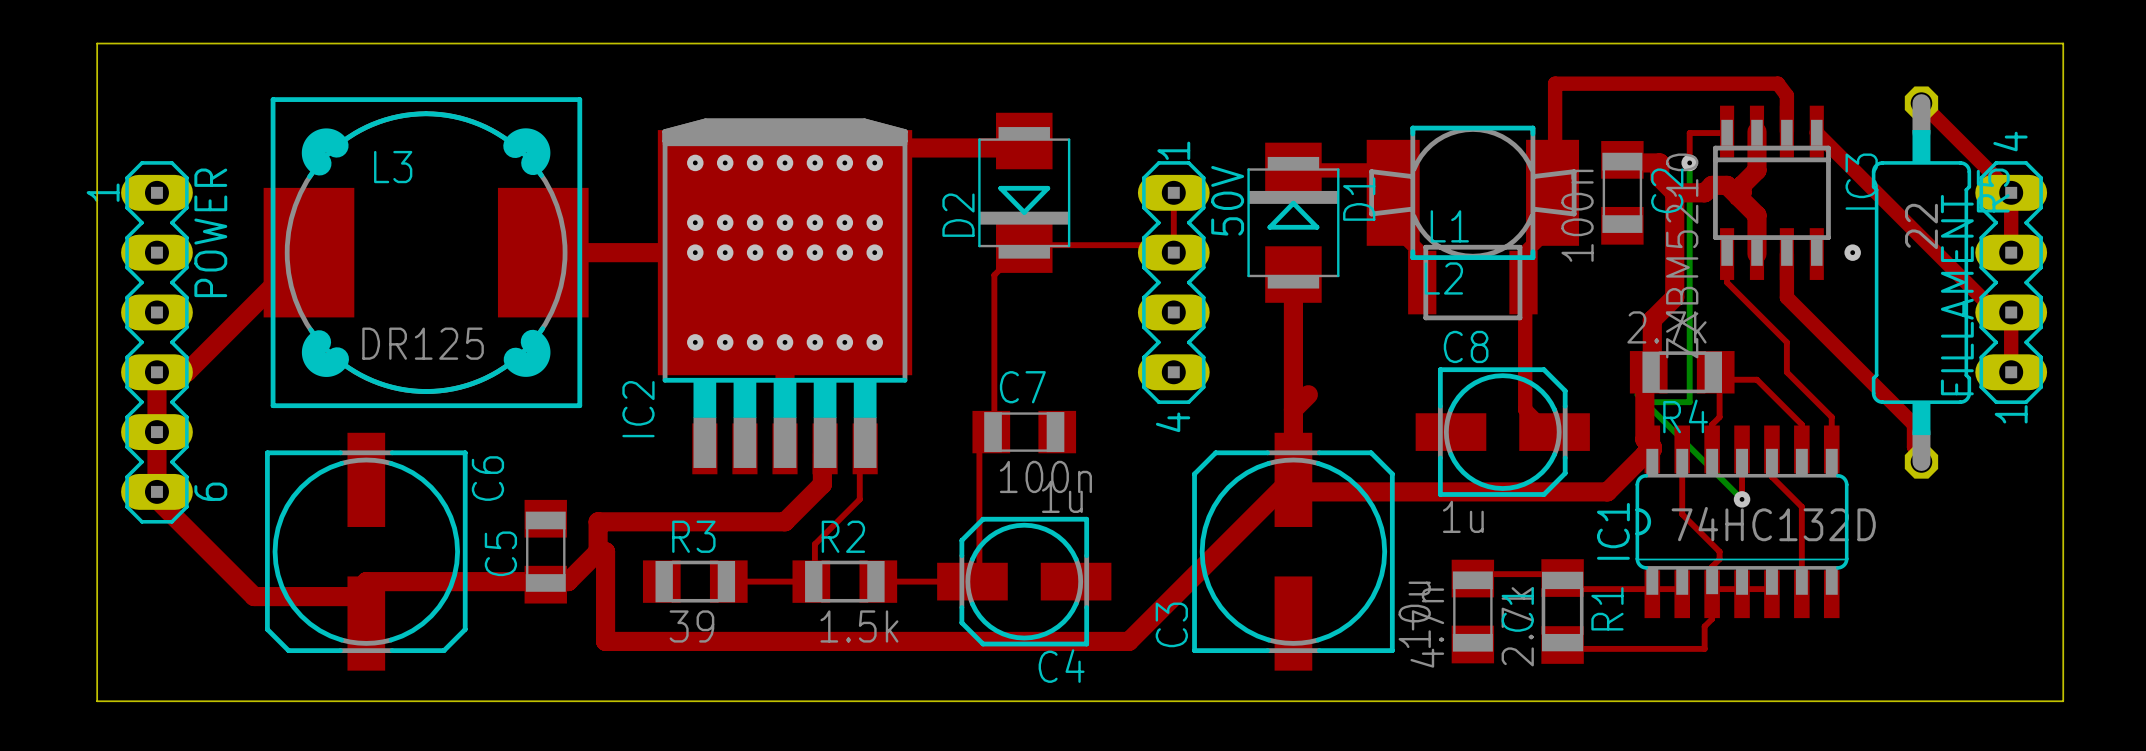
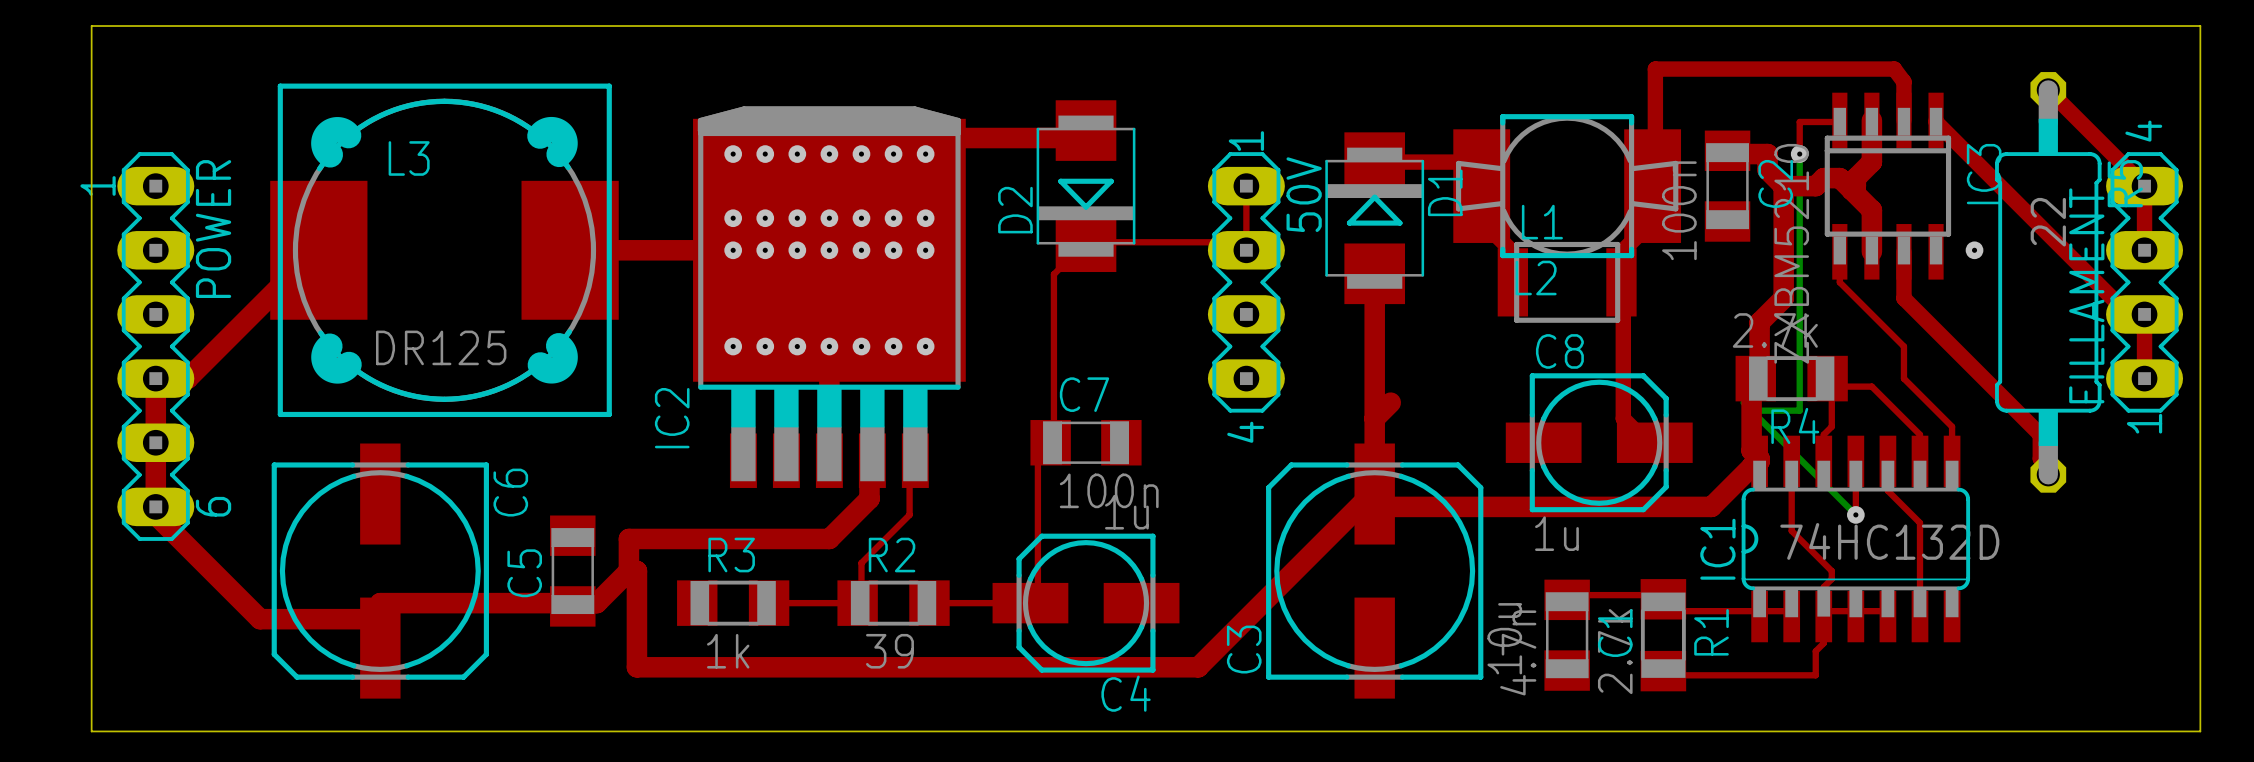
R3 value: 39 (691, 626) -> 1k (728, 651)
R2 value: 1.5k (859, 626) -> 39 (889, 651)

